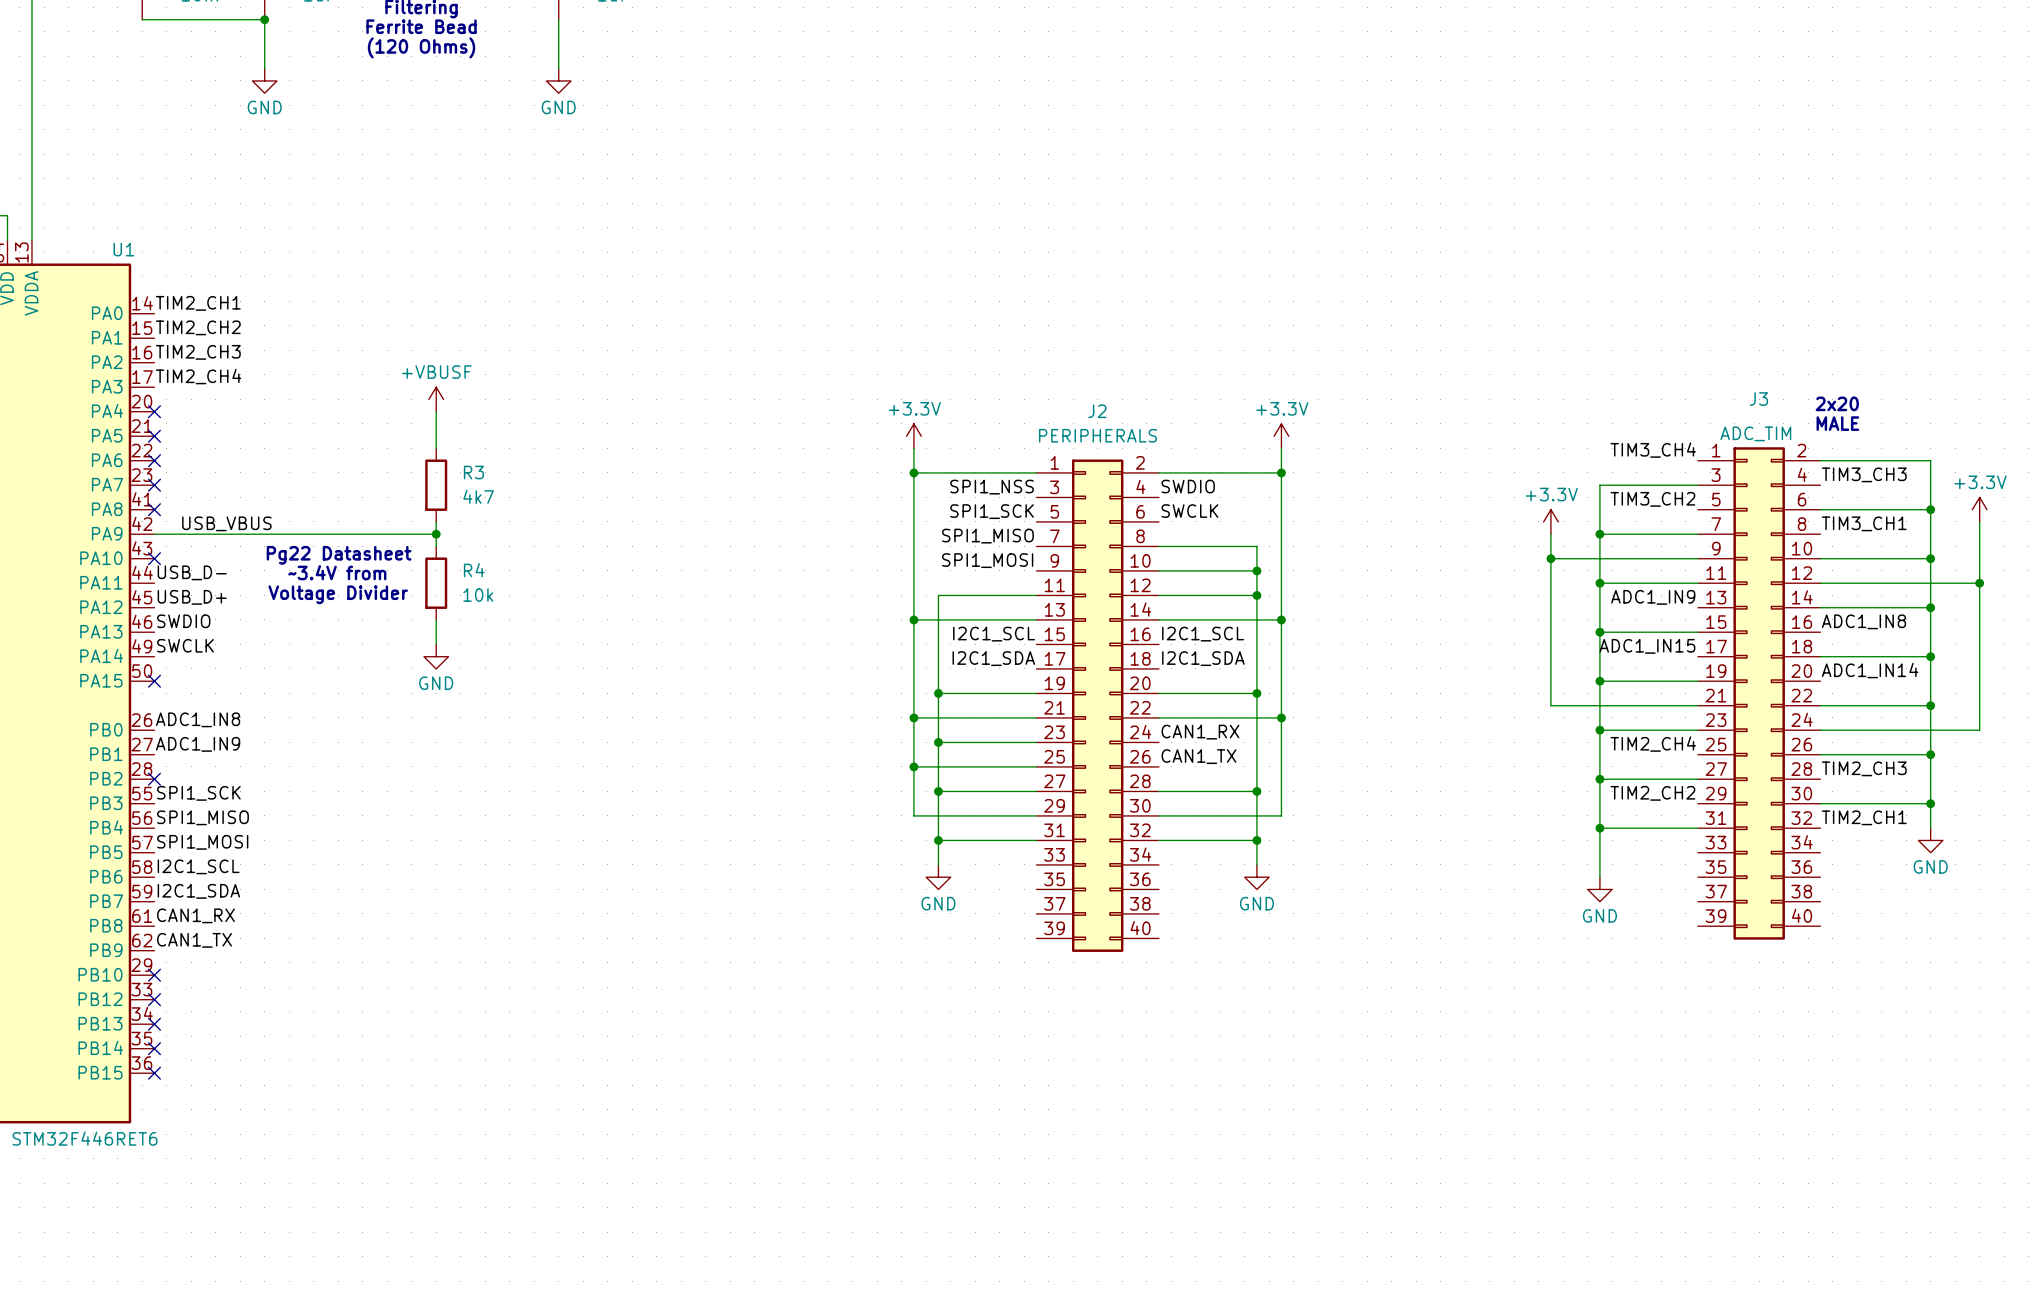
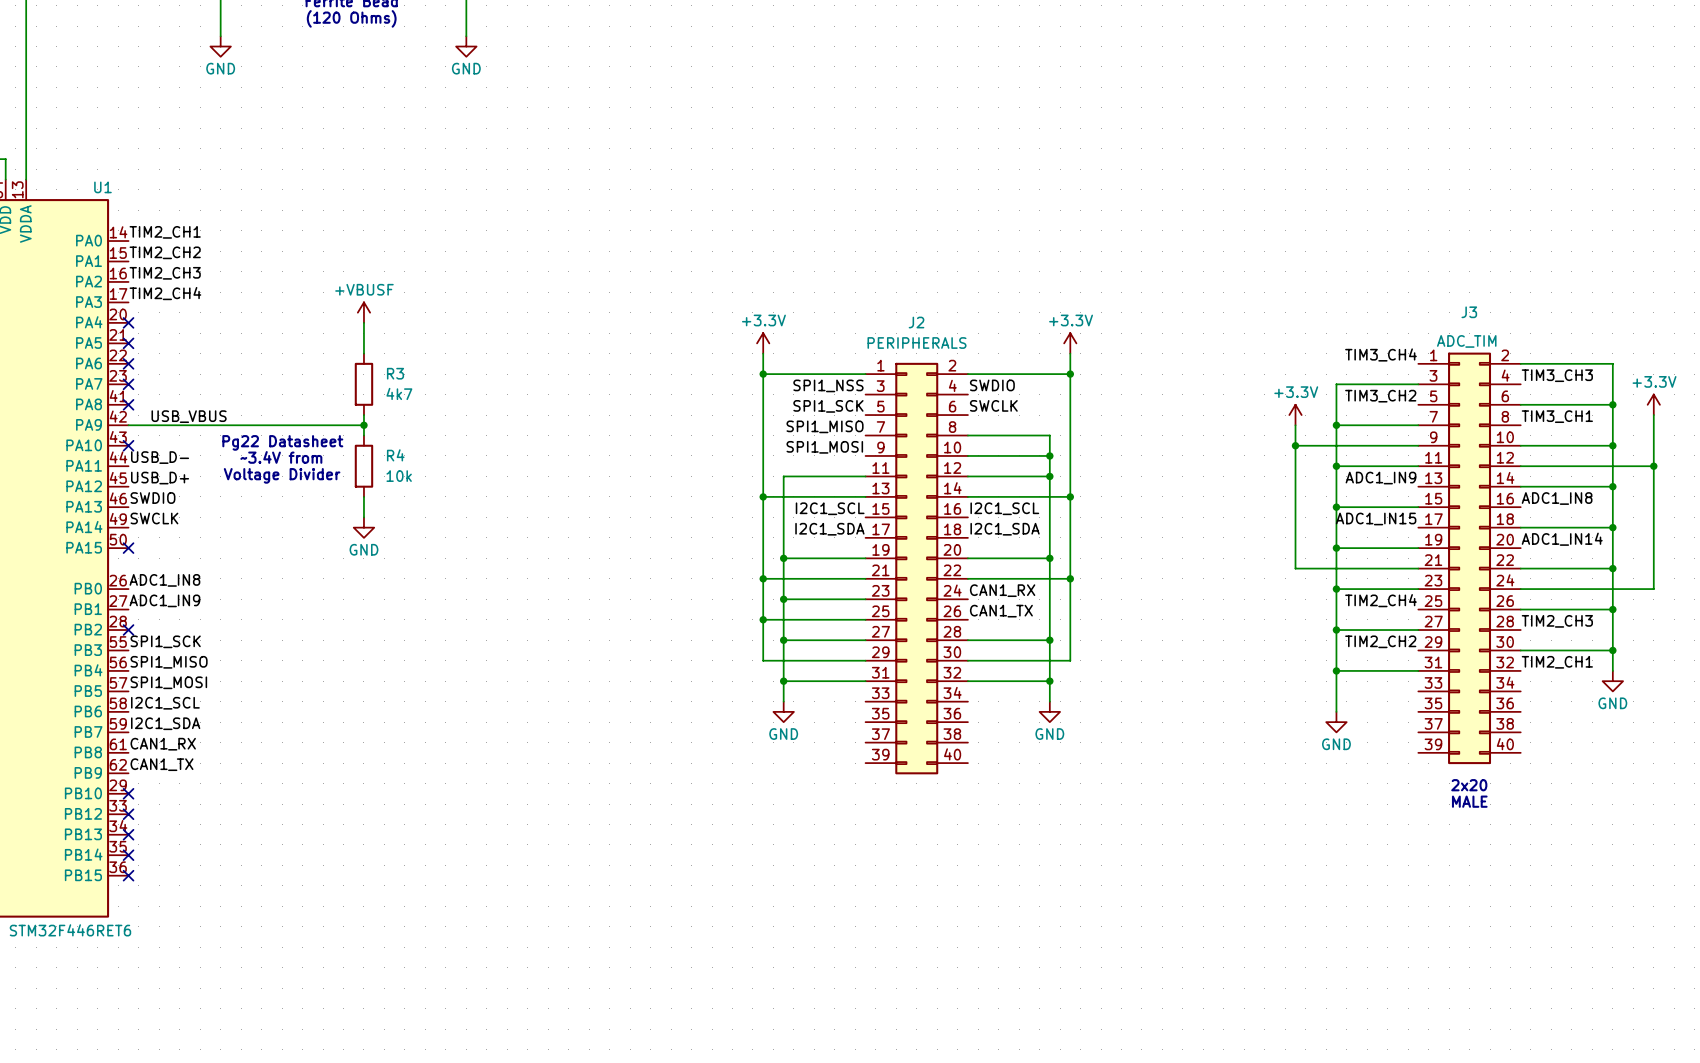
text: 2x20 (1837, 403) -> none
text: MALE (1837, 423) -> none
text: none -> 2x20 (1469, 785)
text: none -> MALE (1469, 801)

